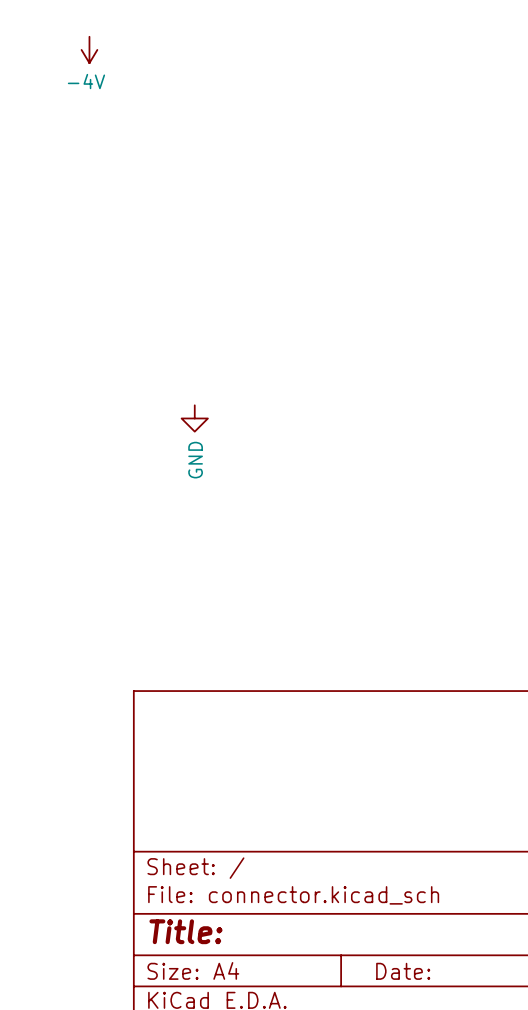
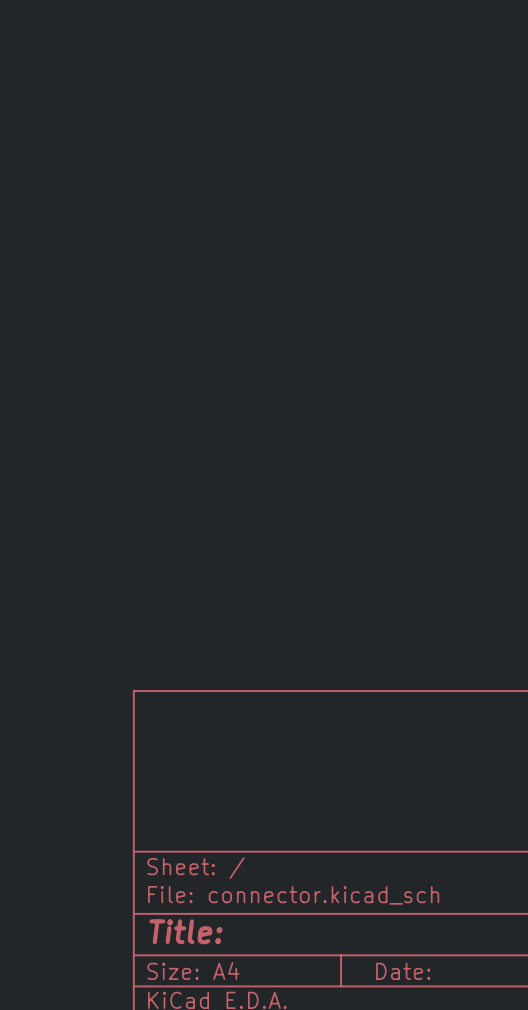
power symbol: -4V (89, 49) -> none
power symbol: GND (194, 418) -> none

